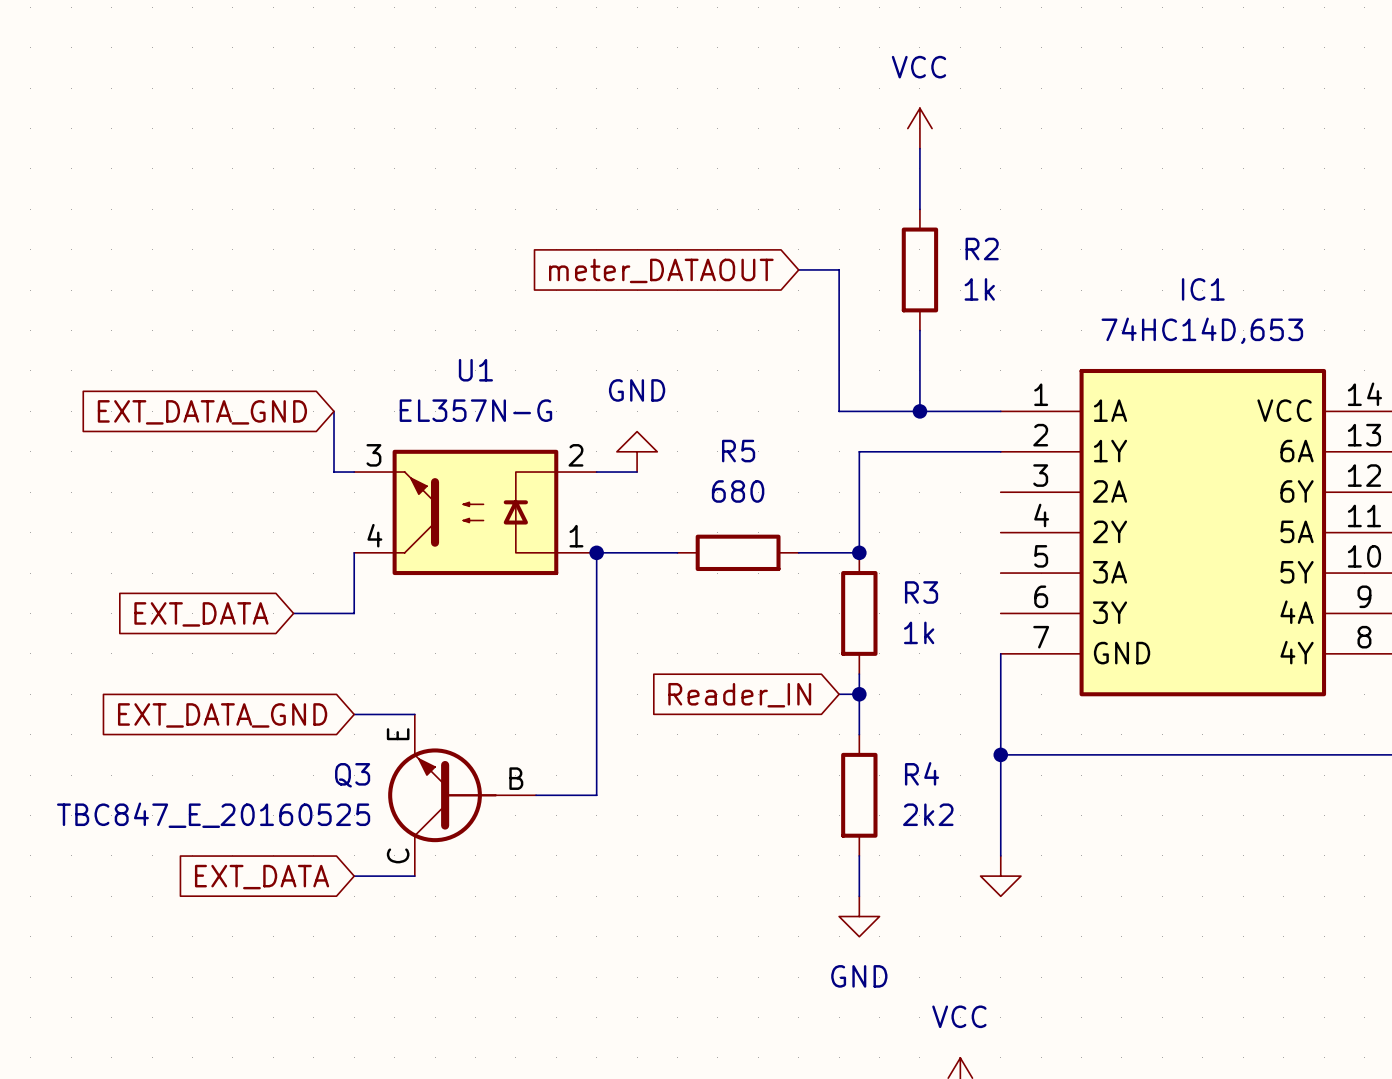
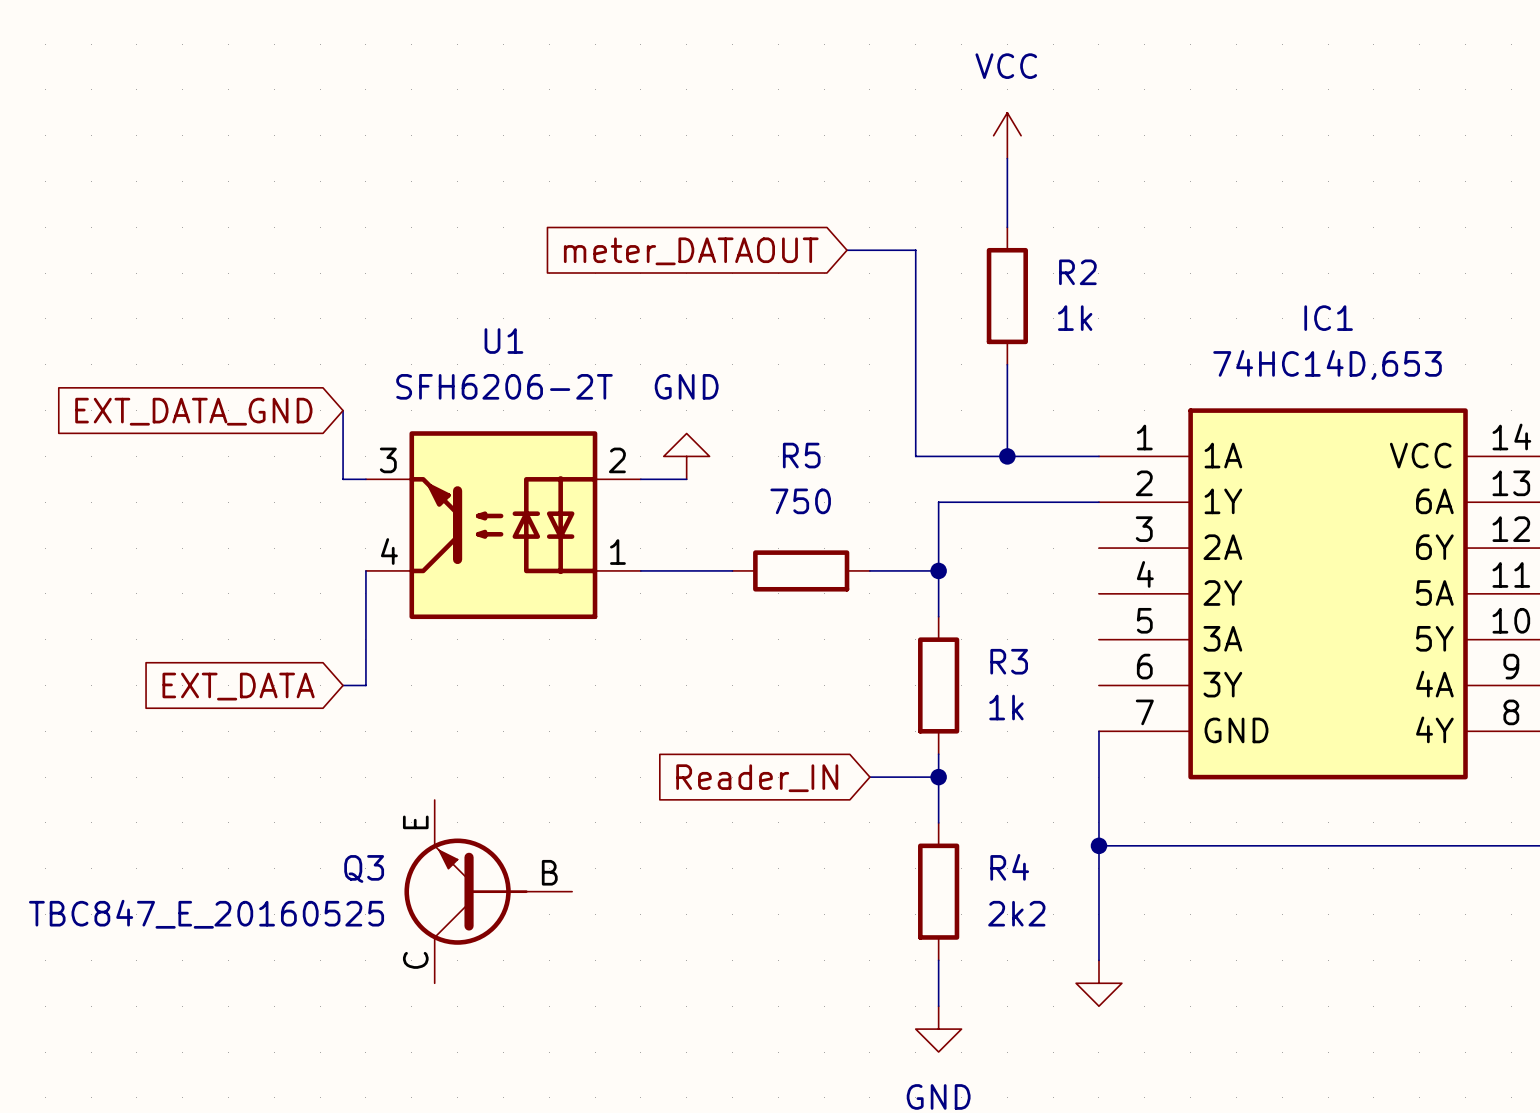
wire: (798, 269) (839, 269) -> (847, 250) (915, 250) (915, 296)
global label position: meter_DATAOUT (661, 270) -> meter_DATAOUT (691, 251)
wire: none -> (343, 410) (343, 456)
U1 value: EL357N-G (475, 410) -> SFH6206-2T (504, 386)
global label position: EXT_DATA_GND (202, 412) -> EXT_DATA_GND (193, 411)
wire: (334, 431) (334, 472) (354, 472) -> (343, 479) (365, 479)
U1 symbol: [354, 449, 597, 576] -> [365, 431, 641, 620]
power symbol position: GND (637, 451) -> GND (686, 456)
wire: (596, 472) (637, 472) -> (640, 479) (686, 479)
R5 value: 680 (738, 491) -> 750 (800, 501)
wire: none -> (365, 570) (365, 616)
wire: none -> (640, 570) (732, 570)
junction: (596, 552) -> none
wire: (677, 552) (596, 552) (596, 795) (536, 795) -> none
R5 position: (738, 552) -> (801, 570)
wire: (798, 552) (859, 552) -> (869, 570) (938, 570)
junction position: (859, 552) -> (938, 570)
wire: (293, 613) (334, 613) -> none
global label position: EXT_DATA (201, 614) -> EXT_DATA (238, 686)
wire: none -> (869, 777) (915, 777)
global label position: Reader_IN (739, 695) -> Reader_IN (757, 778)
wire: (354, 714) (414, 714) -> none
global label: EXT_DATA_GND (222, 715) -> none
wire: (354, 876) (414, 876) -> none
global label: EXT_DATA (262, 877) -> none

